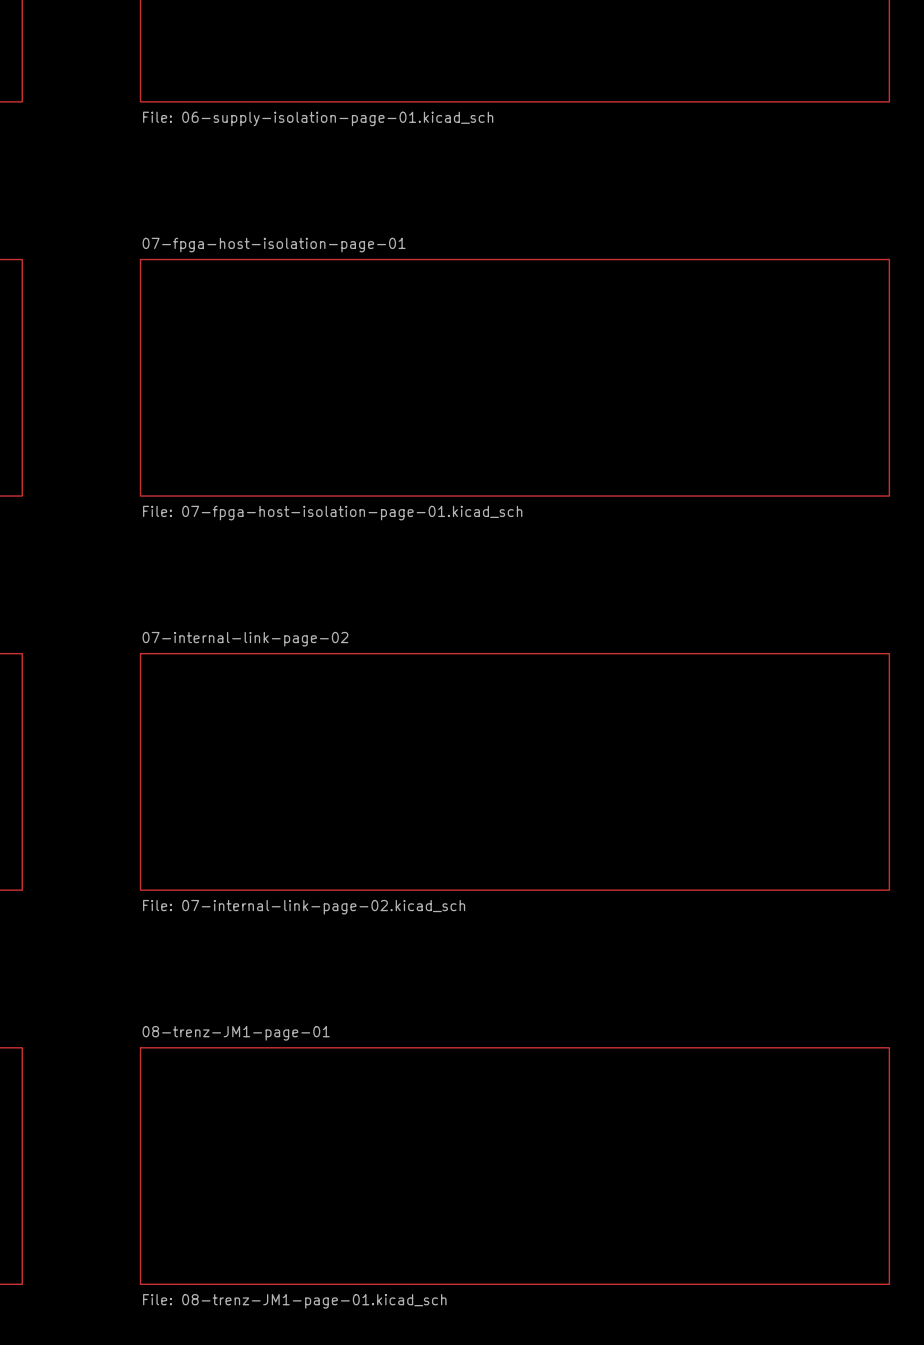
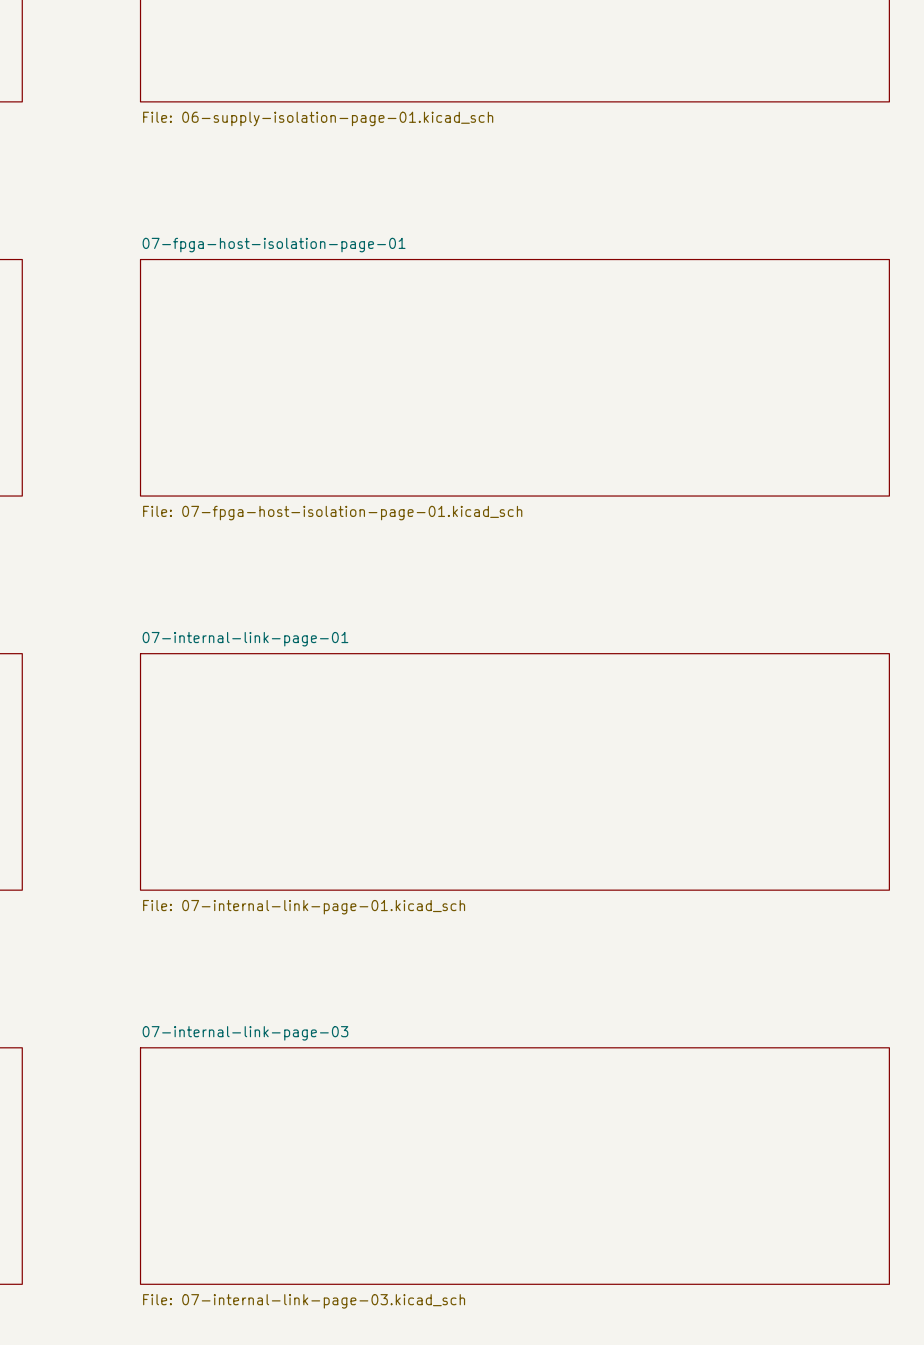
sheet 07-internal-link-page-02 name: 07-internal-link-page-02 (245, 639) -> 07-internal-link-page-01 (245, 639)
sheet 07-internal-link-page-02 value: File: 07-internal-link-page-02.kicad_sch (304, 907) -> File: 07-internal-link-page-01.kicad_sch (304, 907)
sheet 08-trenz-JM1-page-01 name: 08-trenz-JM1-page-01 (236, 1033) -> 07-internal-link-page-03 (245, 1033)
sheet 08-trenz-JM1-page-01 value: File: 08-trenz-JM1-page-01.kicad_sch (294, 1301) -> File: 07-internal-link-page-03.kicad_sch (304, 1301)

